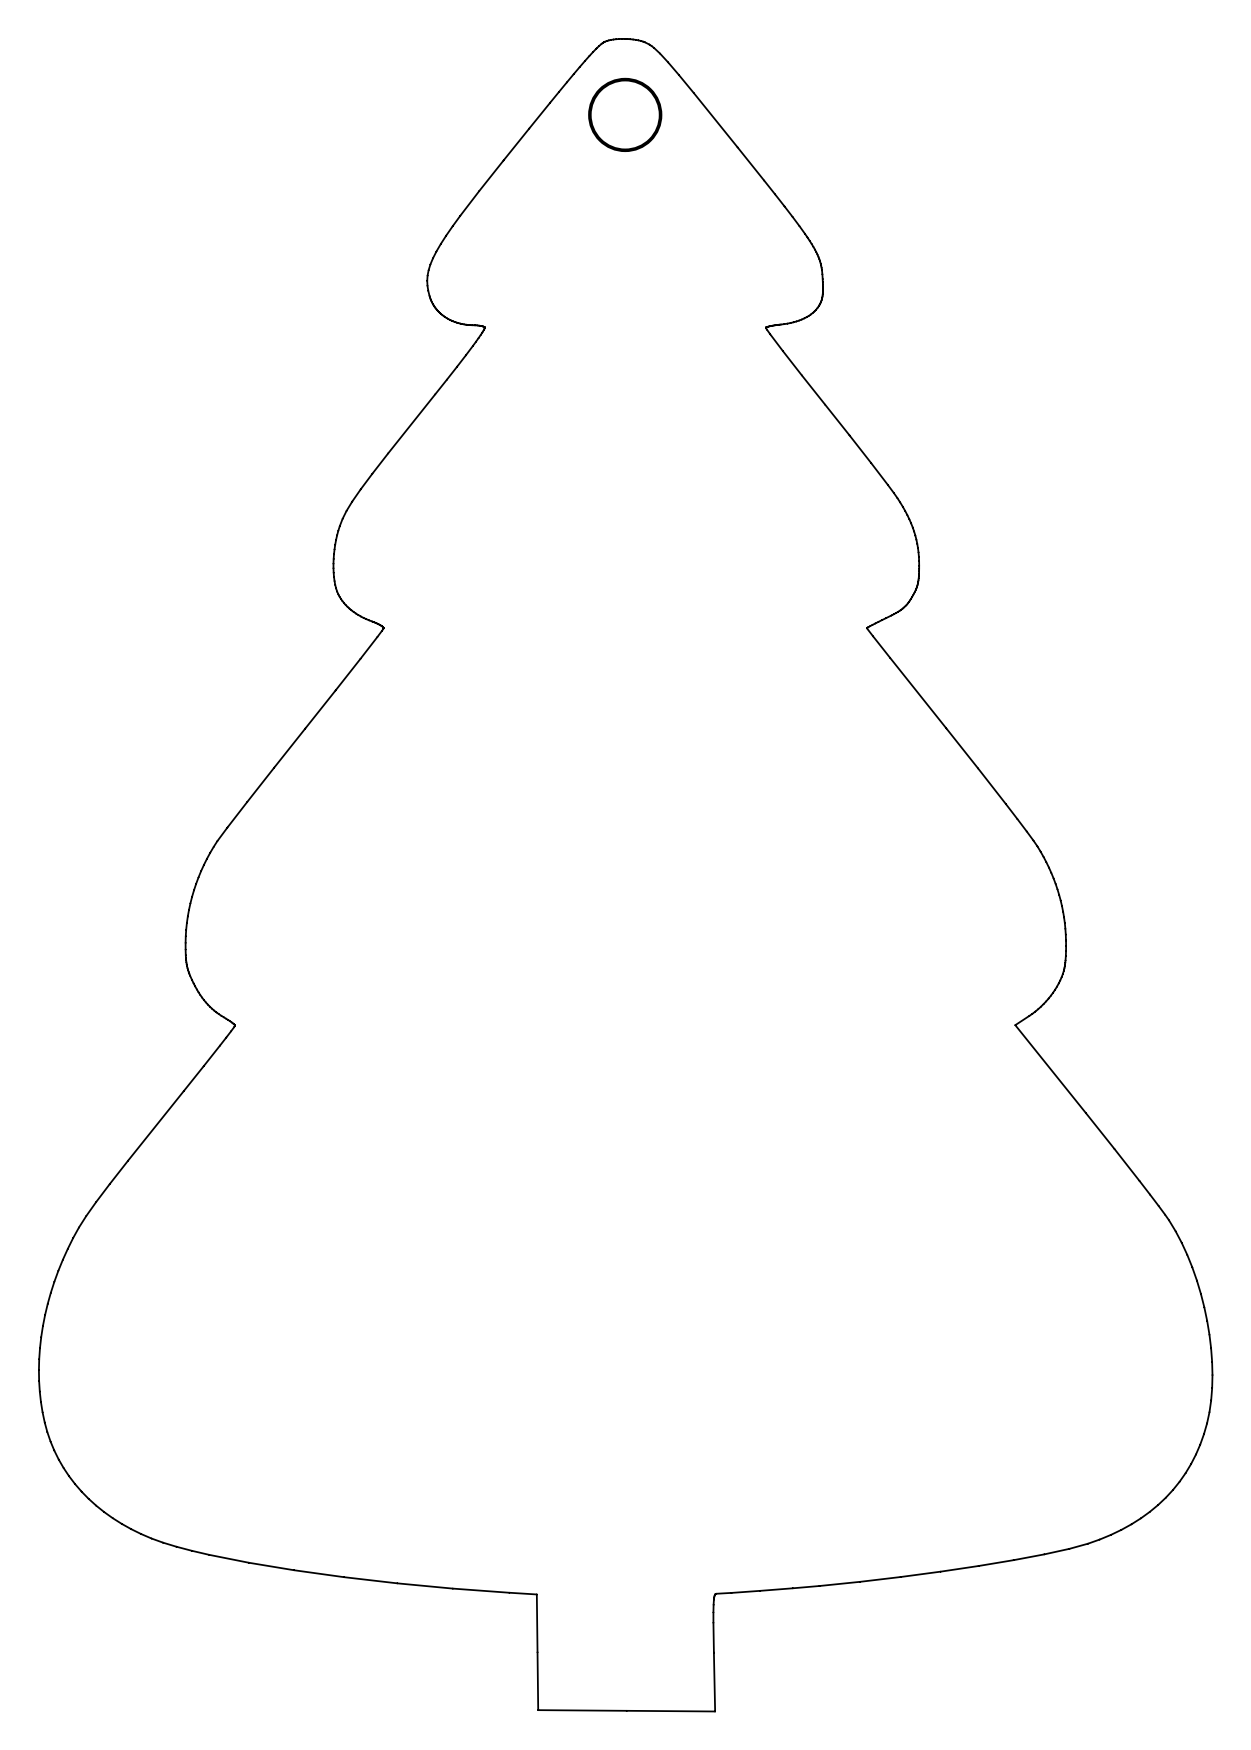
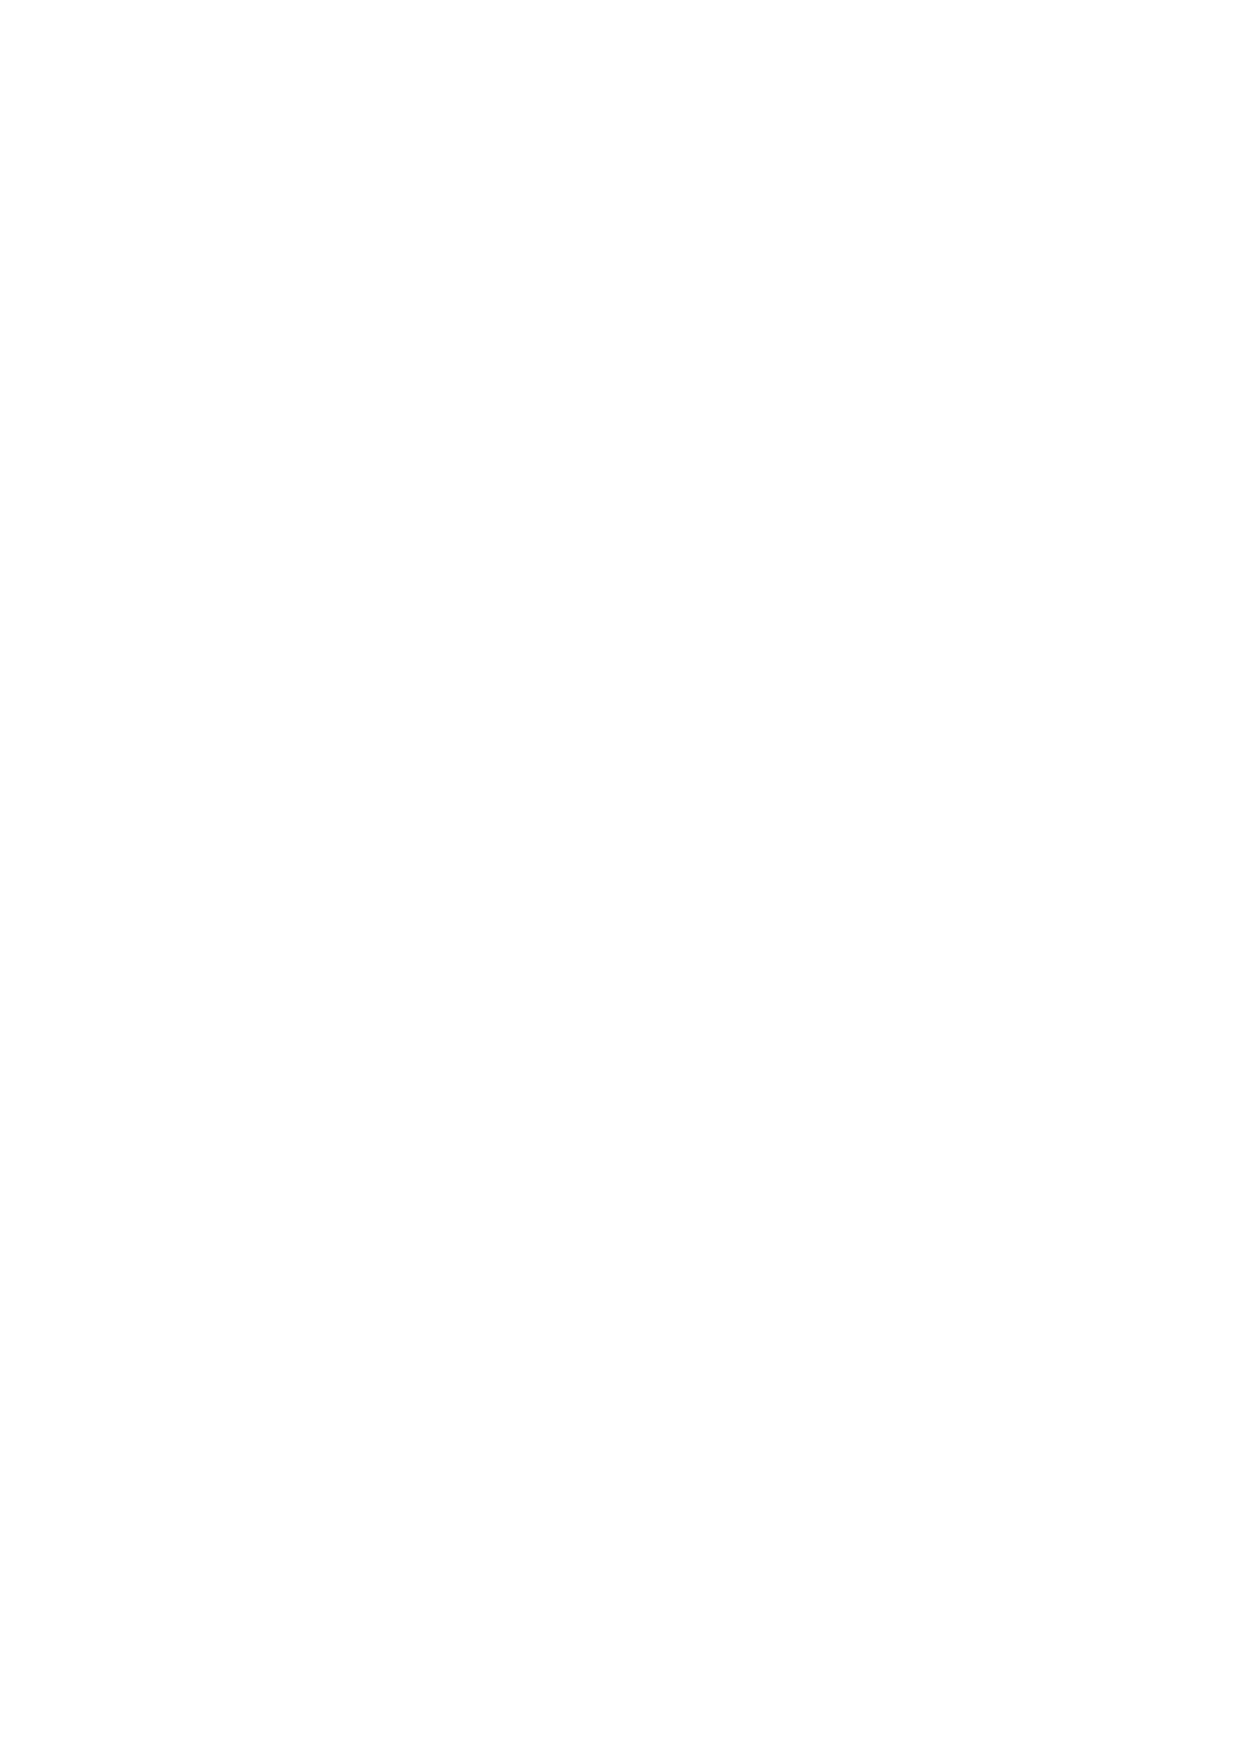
round board edge: [588, 77, 663, 153] -> none
board edge: (484, 327) (465, 355) (360, 489) (346, 510) (339, 526) (333, 558) (334, 577) (337, 591) (342, 600) (351, 610) (383, 627) -> none
board edge: (765, 327) (893, 492) (905, 511) (914, 531) (919, 565) (918, 581) (914, 591) (901, 609) (866, 628) -> none
board edge: (766, 327) (801, 319) (812, 313) (818, 306) (822, 296) (822, 281) (821, 265) (816, 252) (784, 206) (668, 62) (649, 44) (638, 40) (624, 38) (604, 42) (584, 61) (479, 191) (446, 235) (432, 258) (428, 270) (427, 285) (430, 299) (435, 308) (442, 315) (453, 321) (484, 327) -> none
board edge: (383, 628) (227, 827) (210, 852) (198, 877) (186, 923) (185, 949) (187, 968) (195, 986) (205, 1002) (234, 1025) -> none
board edge: (866, 628) (1017, 819) (1046, 862) (1055, 883) (1063, 911) (1066, 940) (1064, 967) (1058, 983) (1048, 998) (1035, 1011) (1015, 1025) (1169, 1220) (1187, 1254) (1200, 1293) (1209, 1334) (1212, 1375) (1209, 1412) (1203, 1434) (1195, 1454) (1179, 1481) (1158, 1505) (1131, 1524) (1088, 1543) (1013, 1560) (859, 1581) (715, 1593) (713, 1612) (715, 1711) (538, 1710) (536, 1594) (397, 1583) (294, 1570) (191, 1550) (162, 1542) (131, 1529) (104, 1512) (81, 1491) (63, 1467) (50, 1441) (42, 1412) (39, 1380) (39, 1348) (45, 1315) (62, 1259) (86, 1216) (235, 1025) -> none

